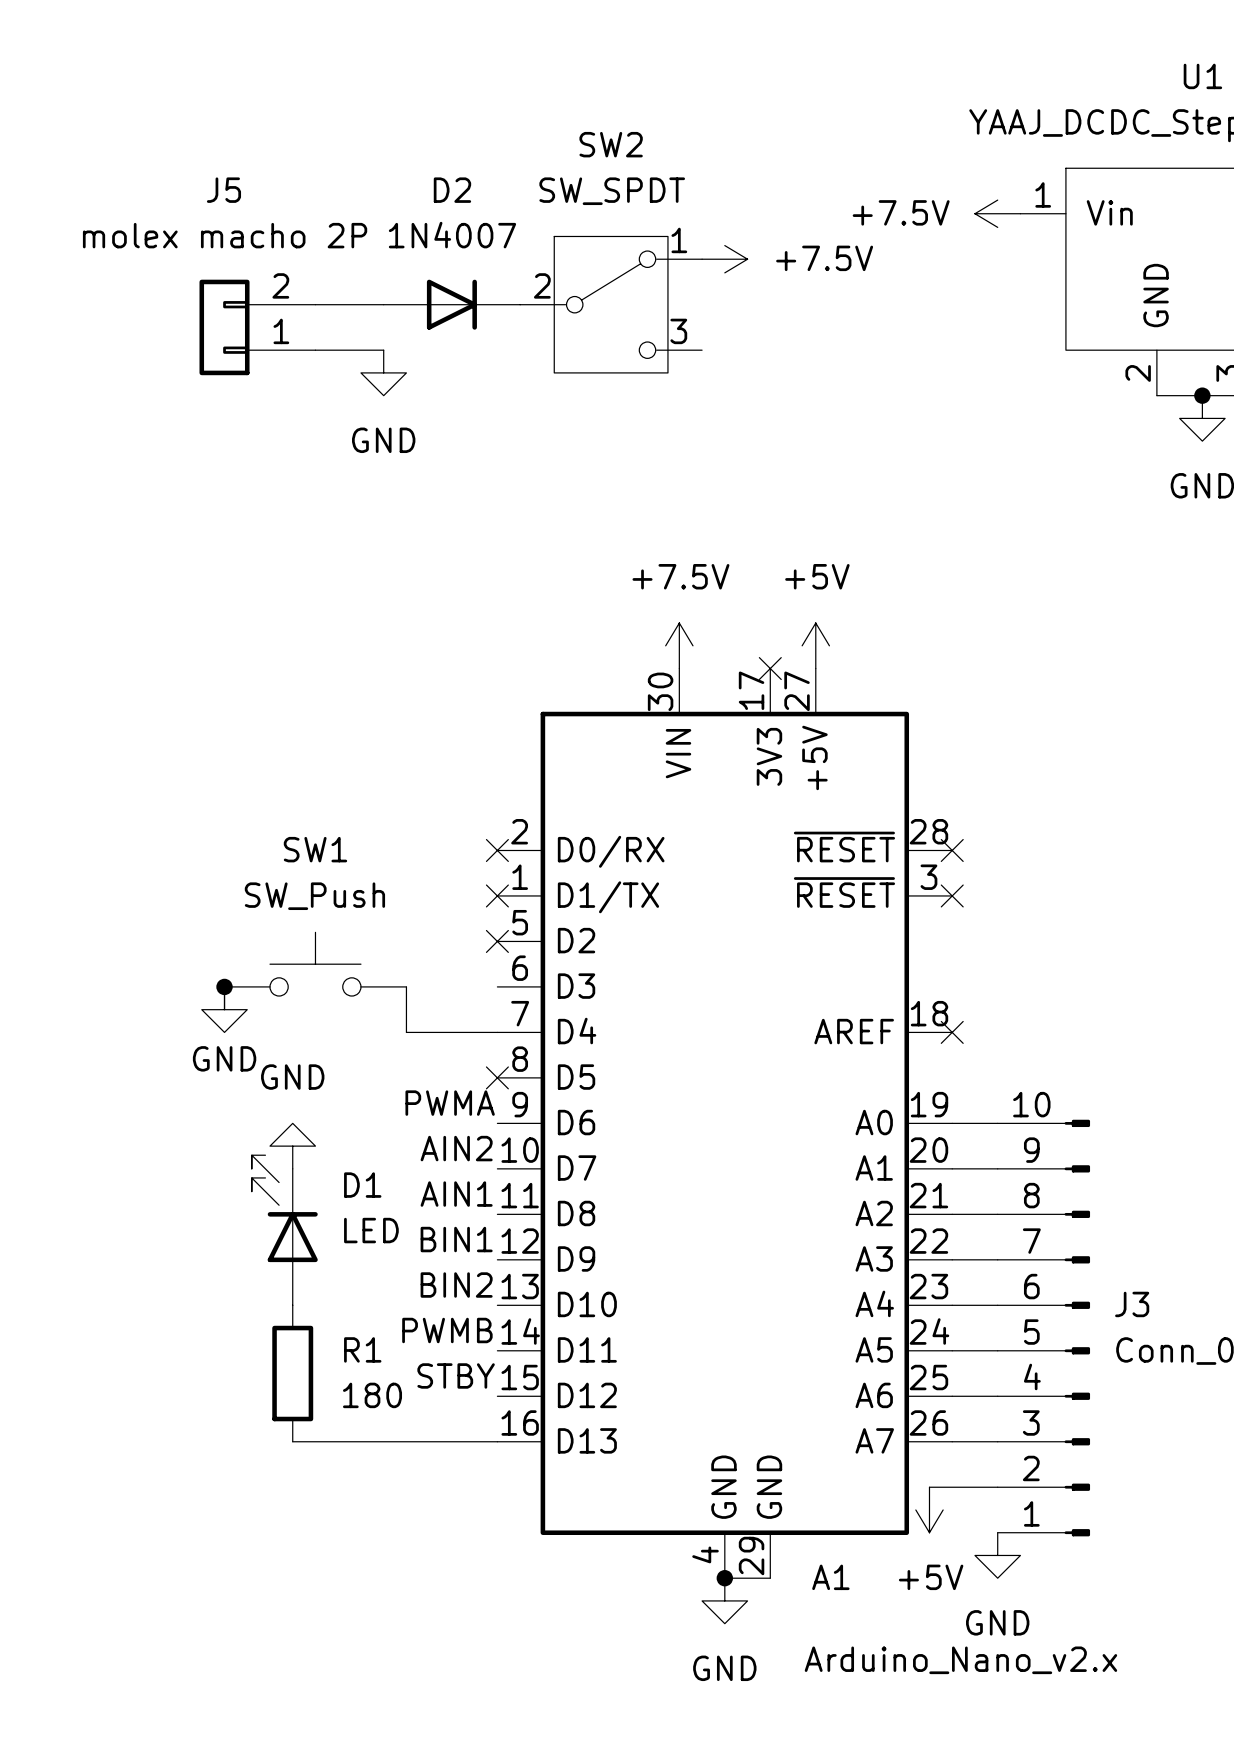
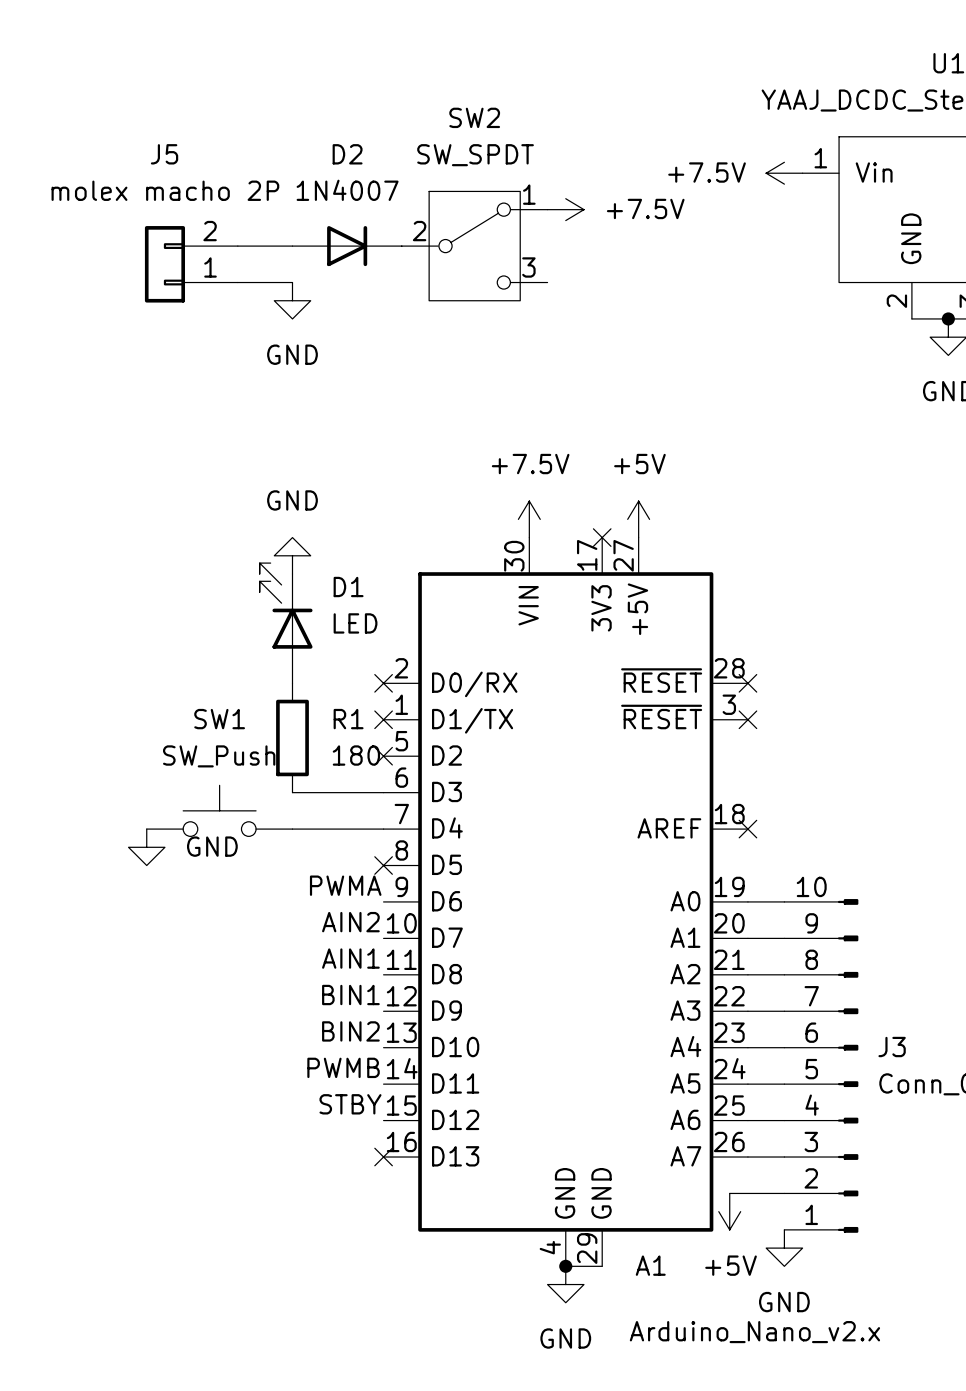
power symbol: none -> GND (292, 555)
SW1 position: (315, 964) -> (219, 810)
junction: (224, 986) -> none
wire: none -> (292, 792) (383, 792)
wire: (406, 986) (406, 1032) -> (292, 829) (310, 829)
power symbol position: GND (224, 1009) -> GND (146, 847)
power symbol text position: GND (224, 1058) -> GND (212, 846)
power symbol: GND (292, 1146) -> none
D1 position: (284, 1230) -> (286, 623)
R1 position: (292, 1373) -> (292, 737)
wire: (292, 1441) (497, 1441) -> none
no-connect mark: none -> (383, 1157)

